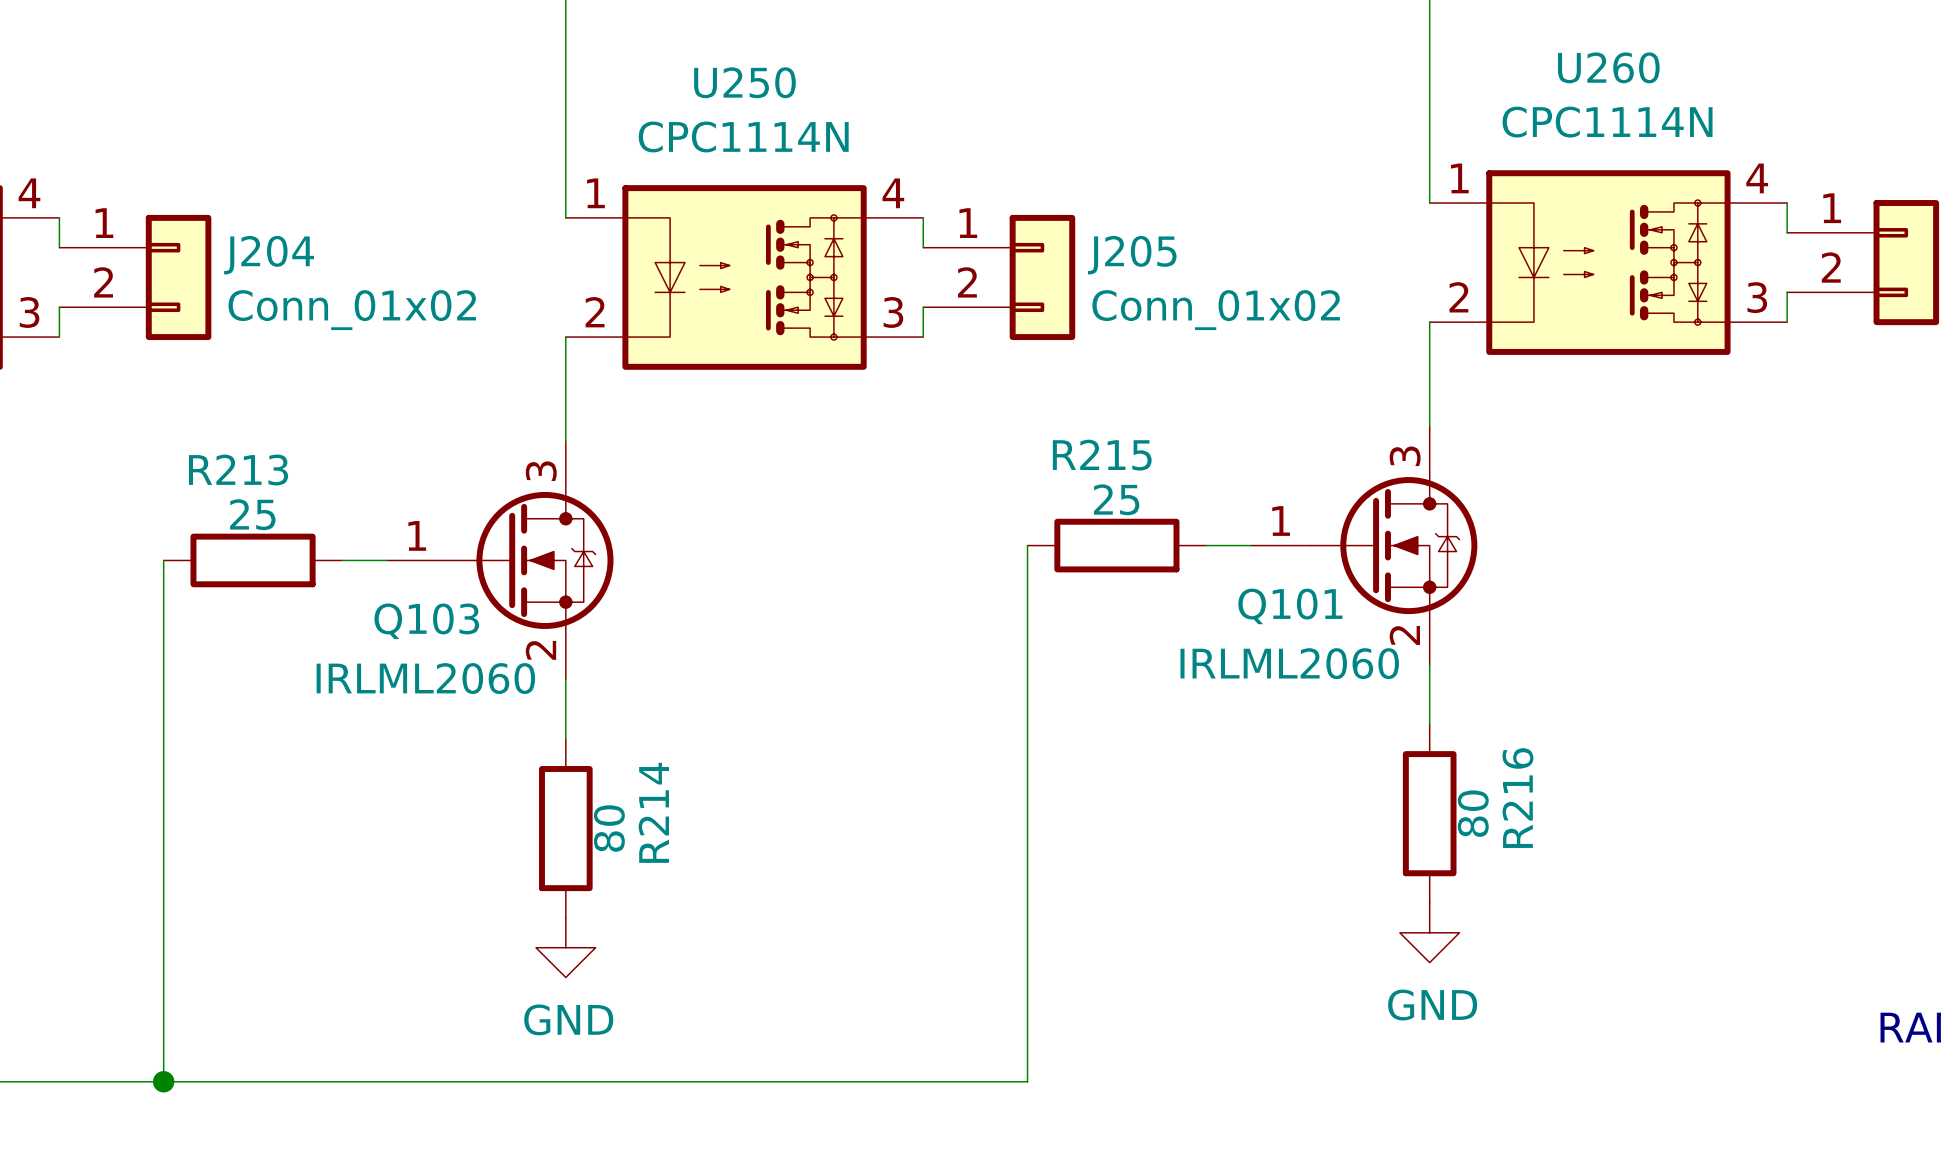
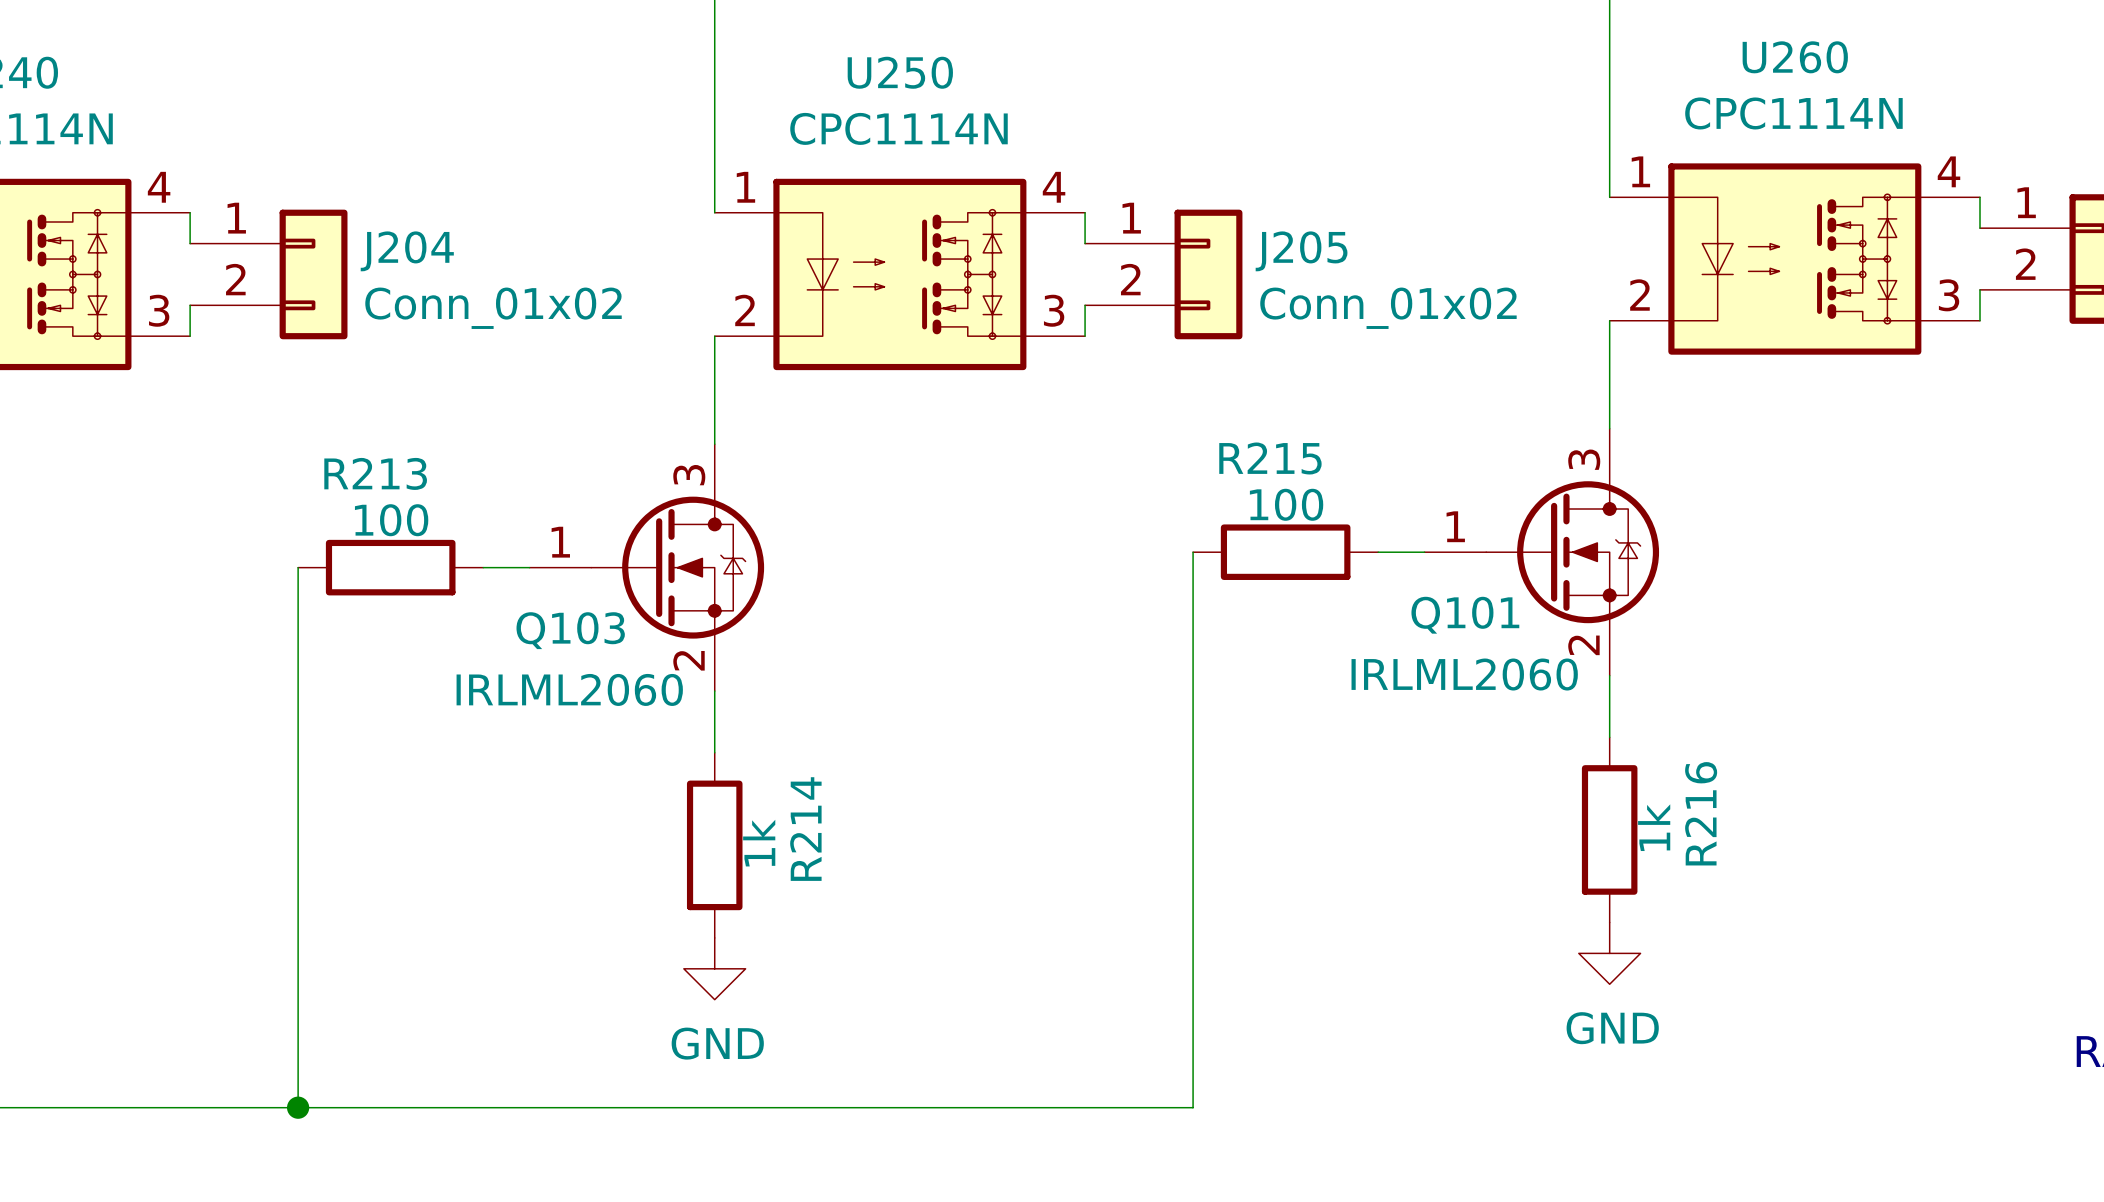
R215 value: 25 (1116, 499) -> 100 (1286, 504)
R213 value: 25 (252, 514) -> 100 (391, 520)
R216 value: 80 (1473, 813) -> 1k (1654, 827)
R214 value: 80 (609, 828) -> 1k (759, 843)

